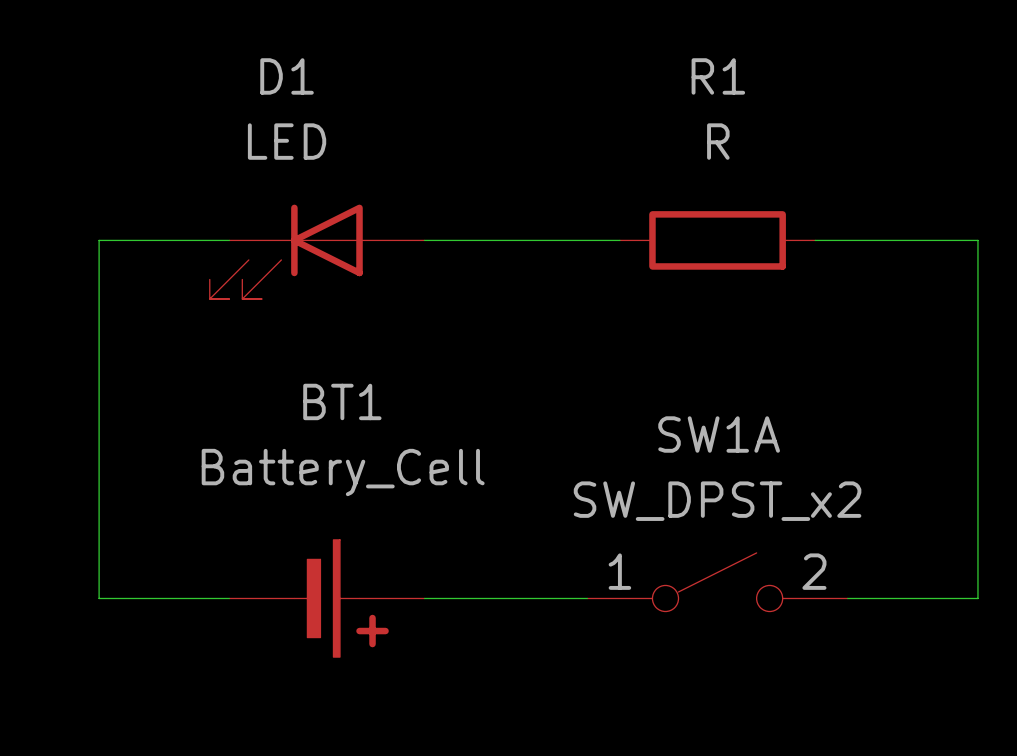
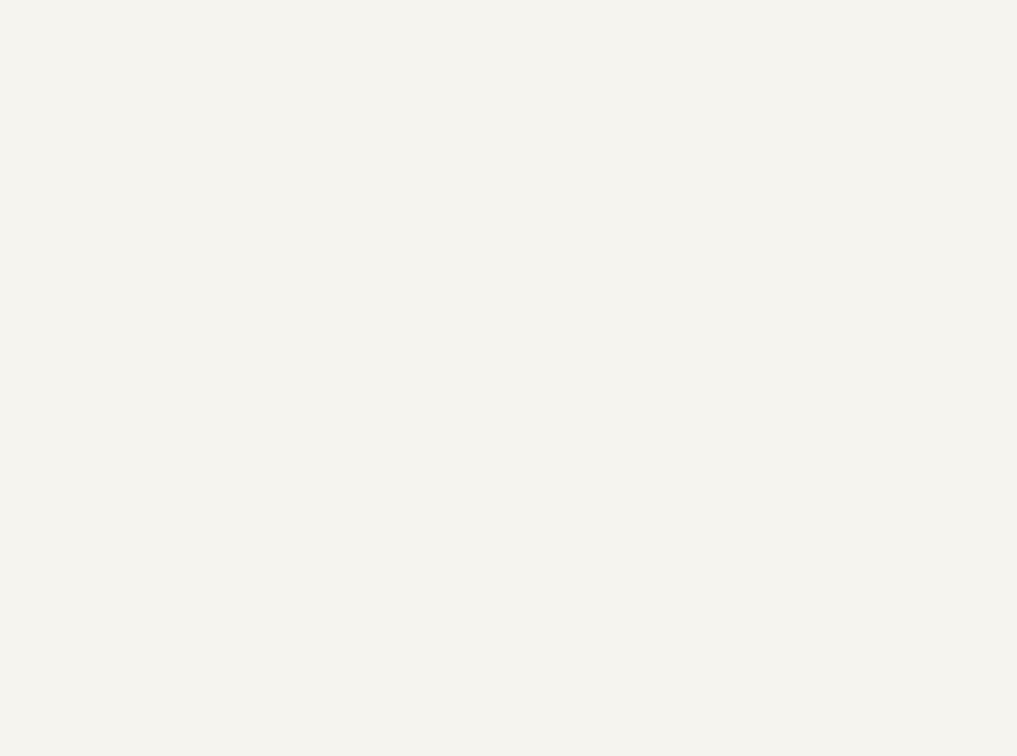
wire: (229, 240) (99, 240) (99, 598) (229, 598) -> none
wire: (424, 240) (619, 240) -> none
R1: R (717, 240) -> none
wire: (815, 240) (977, 240) (977, 598) (847, 598) -> none
D1: LED (317, 251) -> none
SW1A: SW_DPST_x2 (717, 582) -> none
BT1: Battery_Cell (326, 598) -> none
wire: (424, 598) (587, 598) -> none

